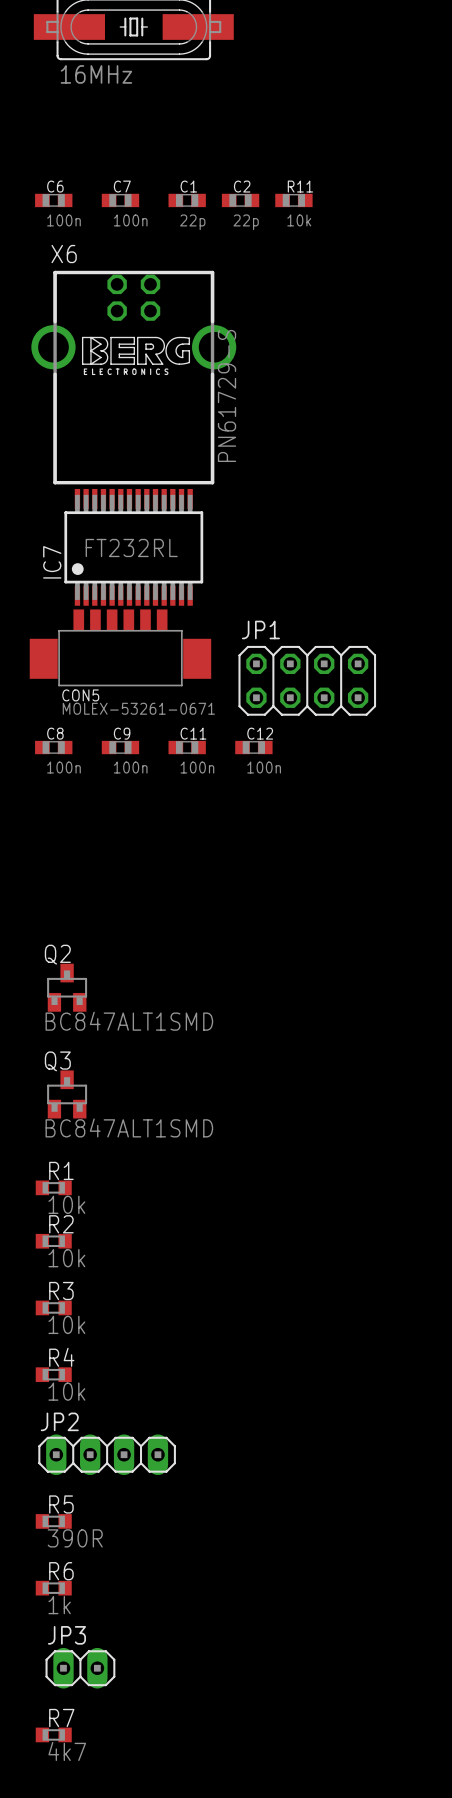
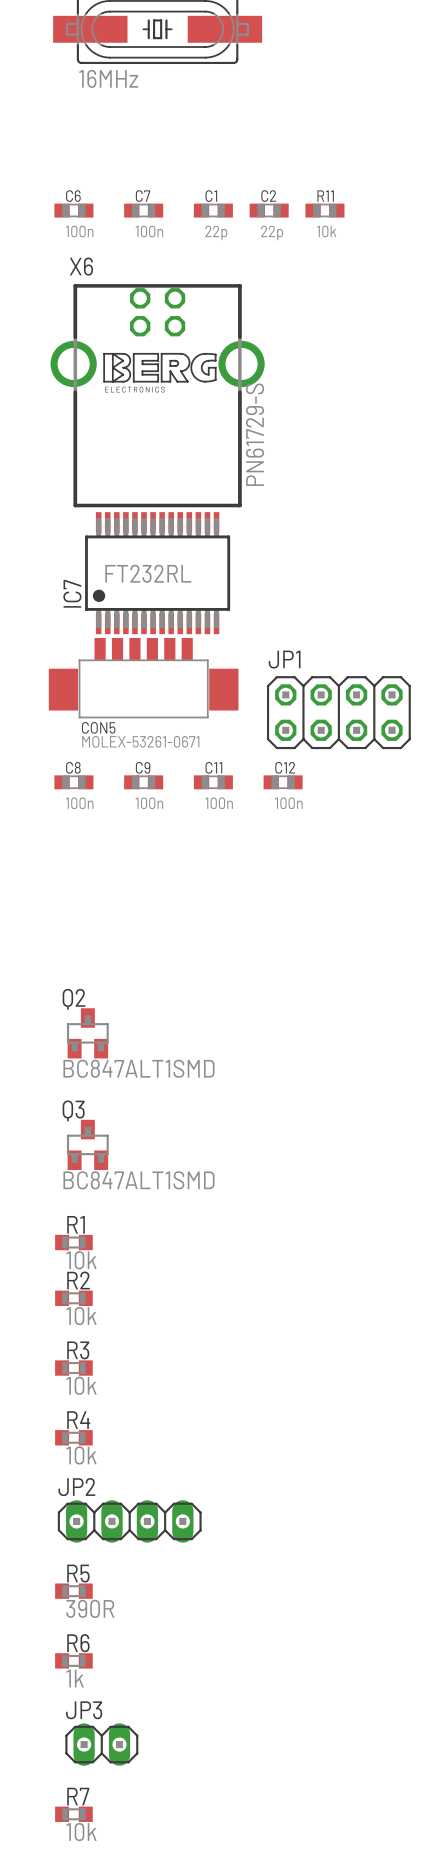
R7 value: 4k7 (67, 1751) -> 10k (81, 1832)

